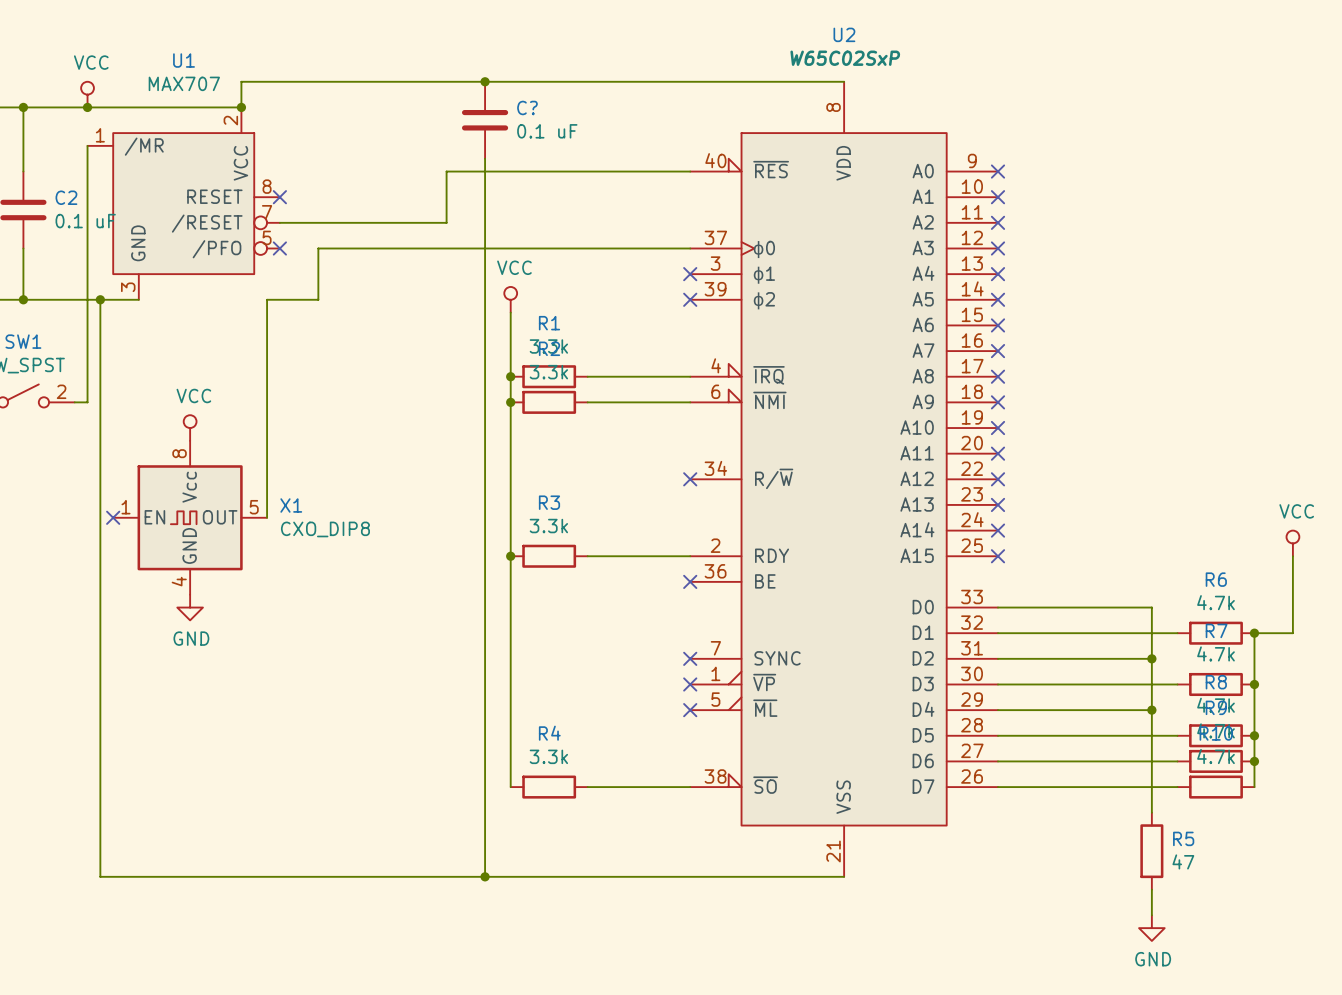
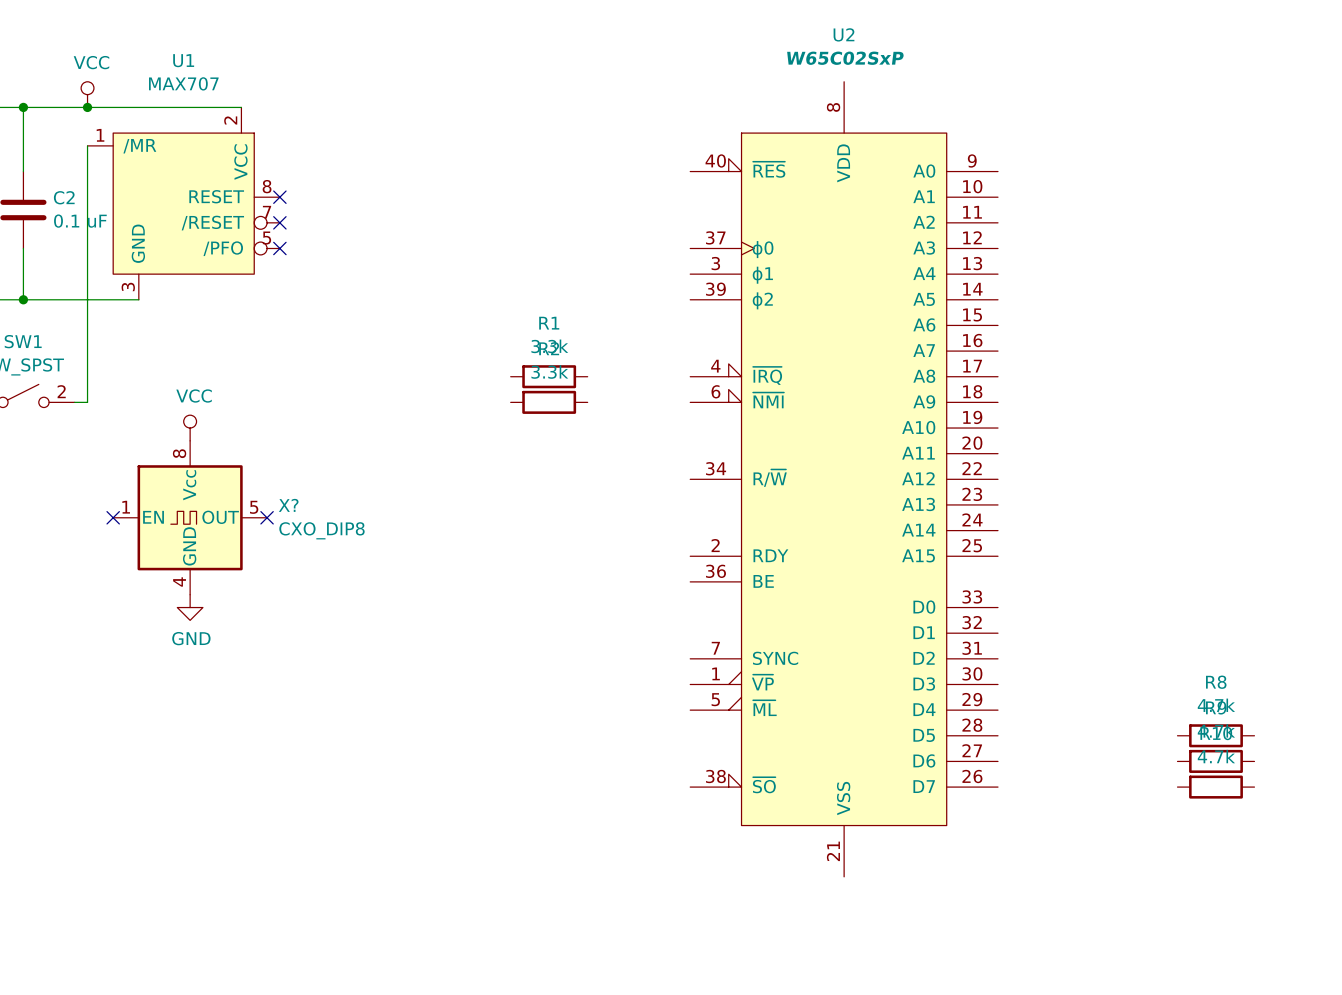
junction: (485, 81) -> none
wire: (844, 81) (241, 81) (241, 107) -> none
junction: (241, 107) -> none
C?: 0.1 uF (485, 120) -> none
wire: (485, 158) (485, 876) -> none
wire: (690, 171) (446, 171) (446, 222) (279, 222) -> none
no-connect mark: (997, 171) -> none
no-connect mark: (997, 197) -> none
no-connect mark: none -> (279, 222)
no-connect mark: (997, 222) -> none
wire: (690, 248) (318, 248) (318, 299) (267, 299) (267, 517) -> none
no-connect mark: (997, 248) -> none
no-connect mark: (690, 274) -> none
no-connect mark: (997, 274) -> none
wire: (100, 299) (100, 876) (844, 876) -> none
junction: (100, 299) -> none
power symbol: VCC (510, 299) -> none
no-connect mark: (690, 299) -> none
no-connect mark: (997, 299) -> none
wire: (510, 312) (510, 787) -> none
no-connect mark: (997, 325) -> none
no-connect mark: (997, 351) -> none
junction: (510, 376) -> none
wire: (587, 376) (690, 376) -> none
no-connect mark: (997, 376) -> none
junction: (510, 402) -> none
wire: (587, 402) (690, 402) -> none
no-connect mark: (997, 402) -> none
no-connect mark: (997, 428) -> none
no-connect mark: (997, 453) -> none
no-connect mark: (690, 479) -> none
no-connect mark: (997, 479) -> none
no-connect mark: (997, 504) -> none
X1 name: X1 (291, 505) -> X? (288, 505)
no-connect mark: none -> (267, 517)
no-connect mark: (997, 530) -> none
power symbol: VCC (1292, 543) -> none
junction: (510, 556) -> none
R3: 3.3k (549, 556) -> none
wire: (587, 556) (690, 556) -> none
no-connect mark: (997, 556) -> none
wire: (1292, 556) (1292, 633) (1254, 633) (1254, 787) -> none
no-connect mark: (690, 581) -> none
wire: (997, 607) (1151, 607) (1151, 812) -> none
wire: (997, 633) (1177, 633) -> none
R6: 4.7k (1215, 633) -> none
junction: (1254, 633) -> none
no-connect mark: (690, 658) -> none
wire: (997, 658) (1151, 658) -> none
junction: (1151, 658) -> none
no-connect mark: (690, 684) -> none
wire: (997, 684) (1177, 684) -> none
R7: 4.7k (1215, 684) -> none
junction: (1254, 684) -> none
no-connect mark: (690, 710) -> none
wire: (997, 710) (1151, 710) -> none
junction: (1151, 710) -> none
wire: (997, 735) (1177, 735) -> none
junction: (1254, 735) -> none
wire: (997, 761) (1177, 761) -> none
junction: (1254, 761) -> none
R4: 3.3k (549, 787) -> none
wire: (587, 787) (690, 787) -> none
wire: (997, 787) (1177, 787) -> none
R5: 47 (1151, 851) -> none
junction: (485, 876) -> none
wire: (1151, 889) (1151, 915) -> none
power symbol: GND (1151, 928) -> none

